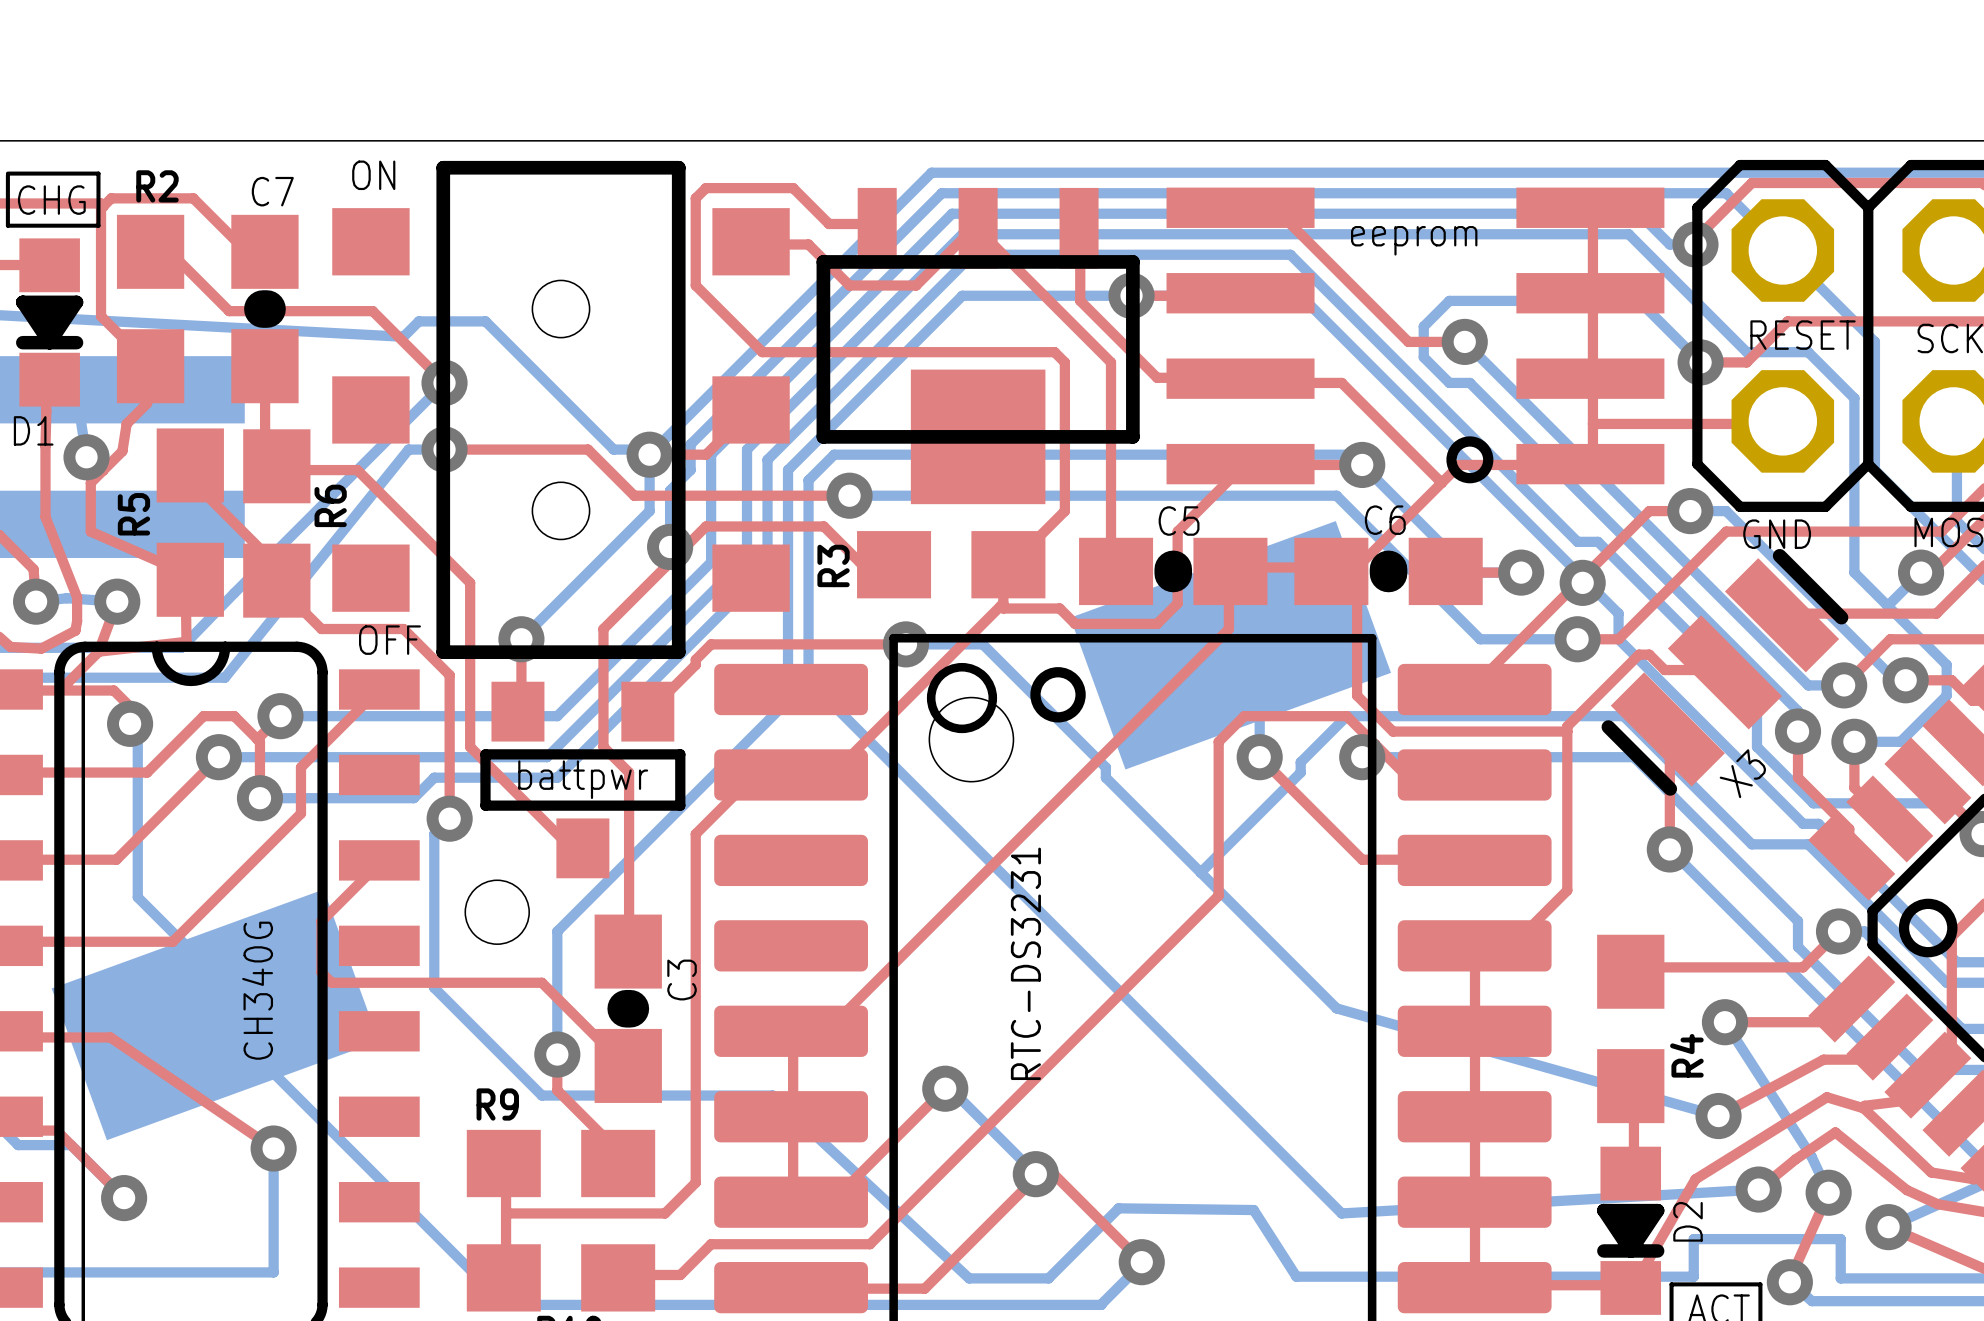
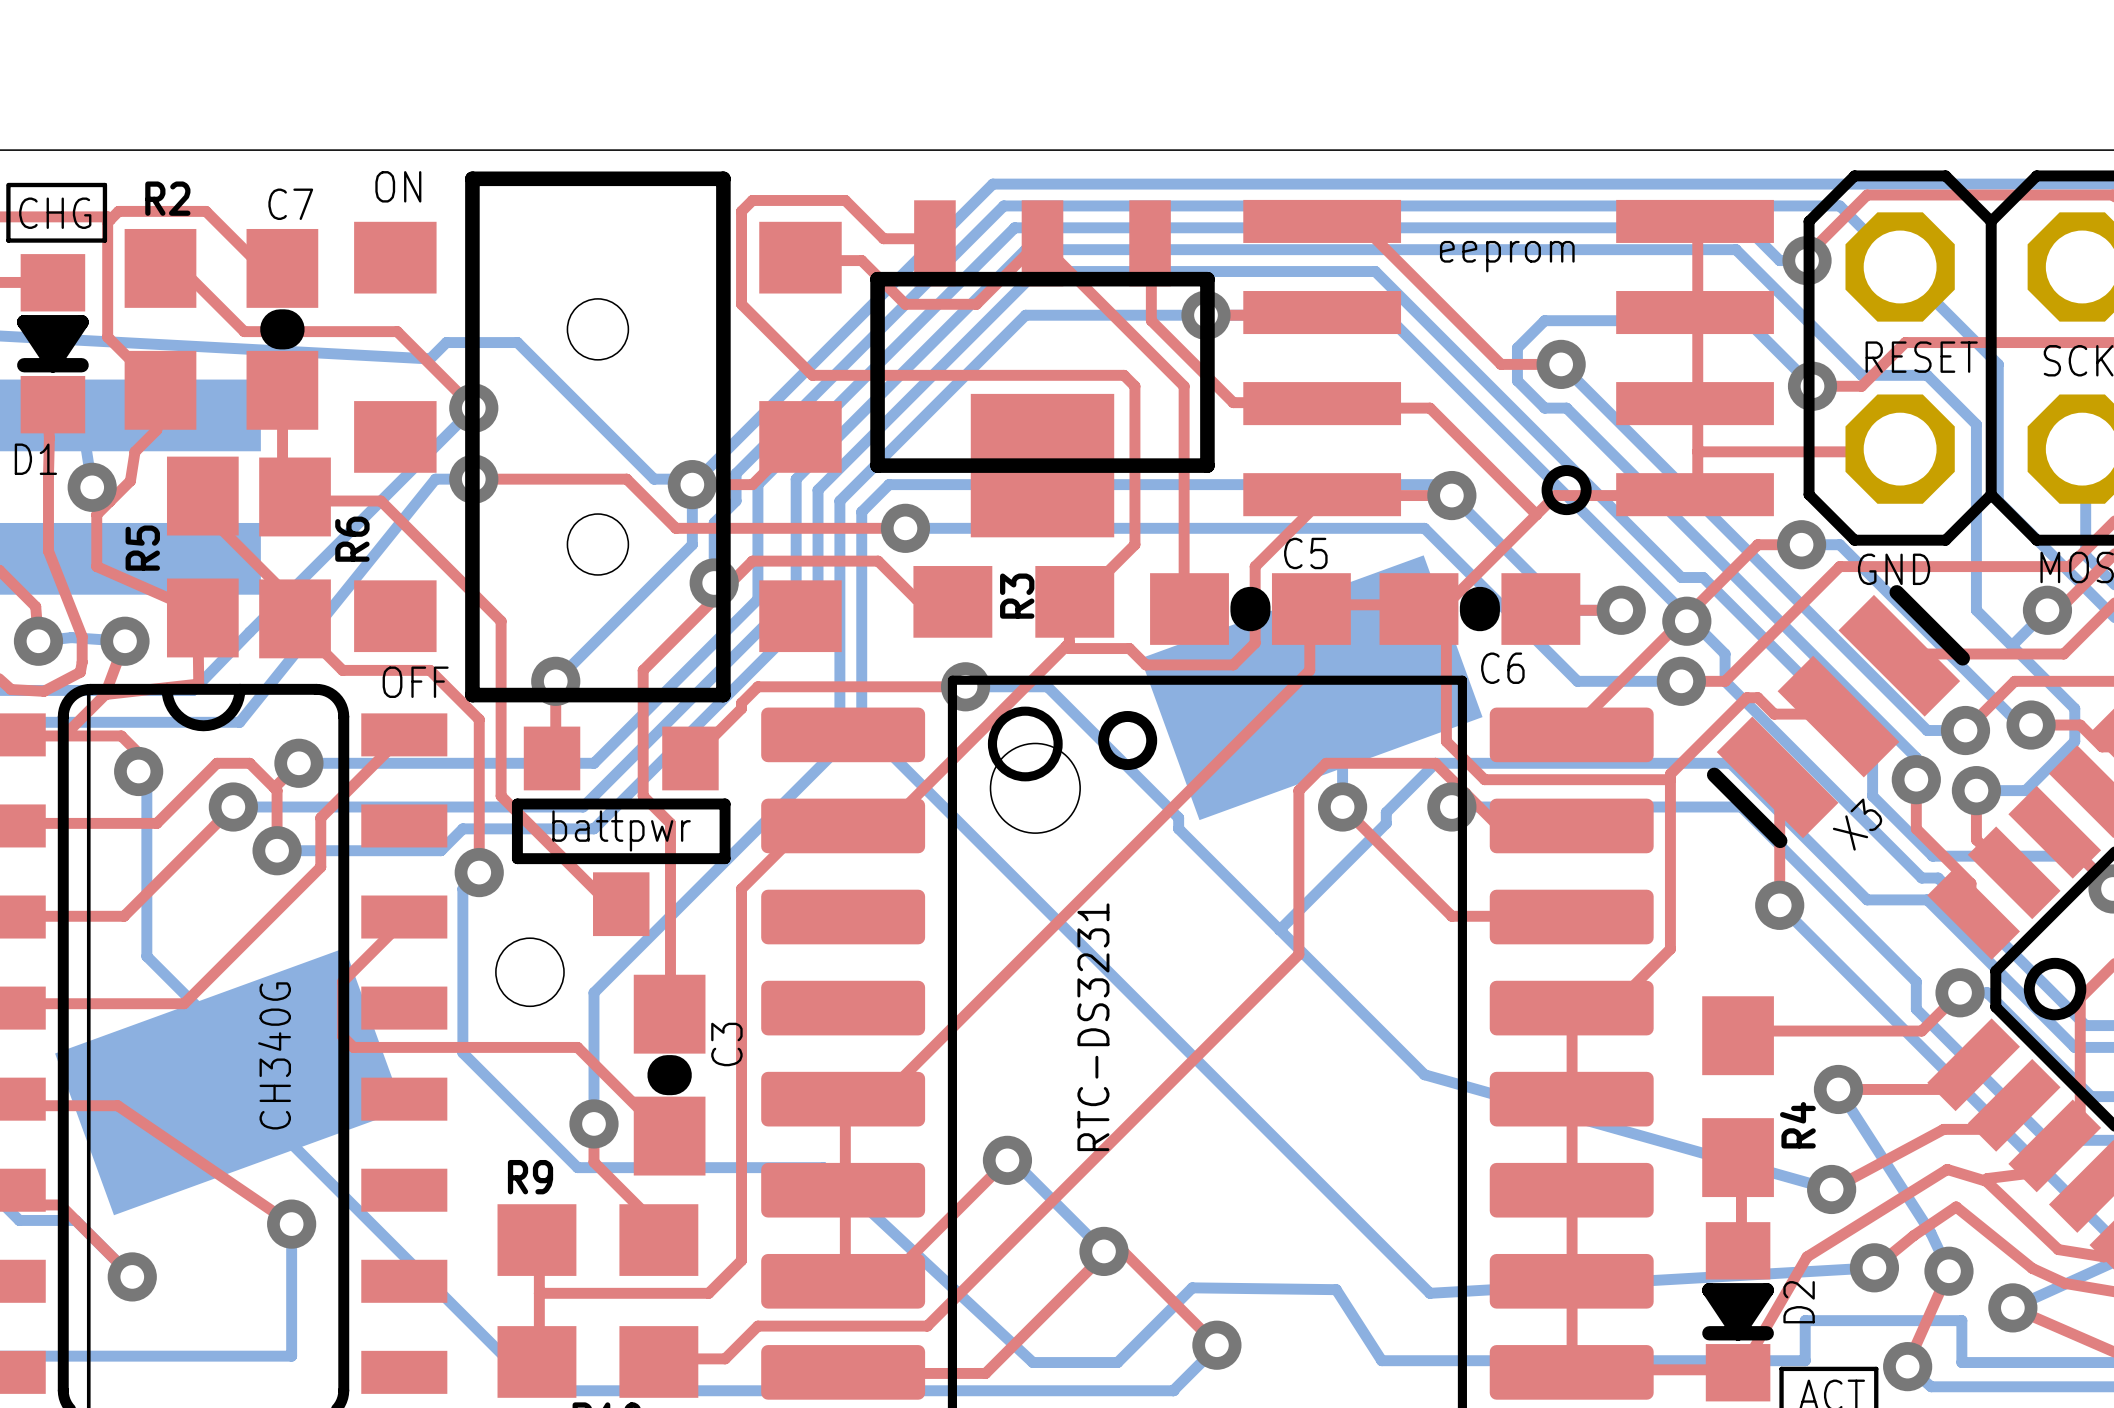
C6 name position: C6 (1385, 520) -> C6 (1502, 668)
C5 name position: C5 (1179, 521) -> C5 (1305, 553)
R3 name position: R3 (833, 565) -> R3 (1017, 596)

